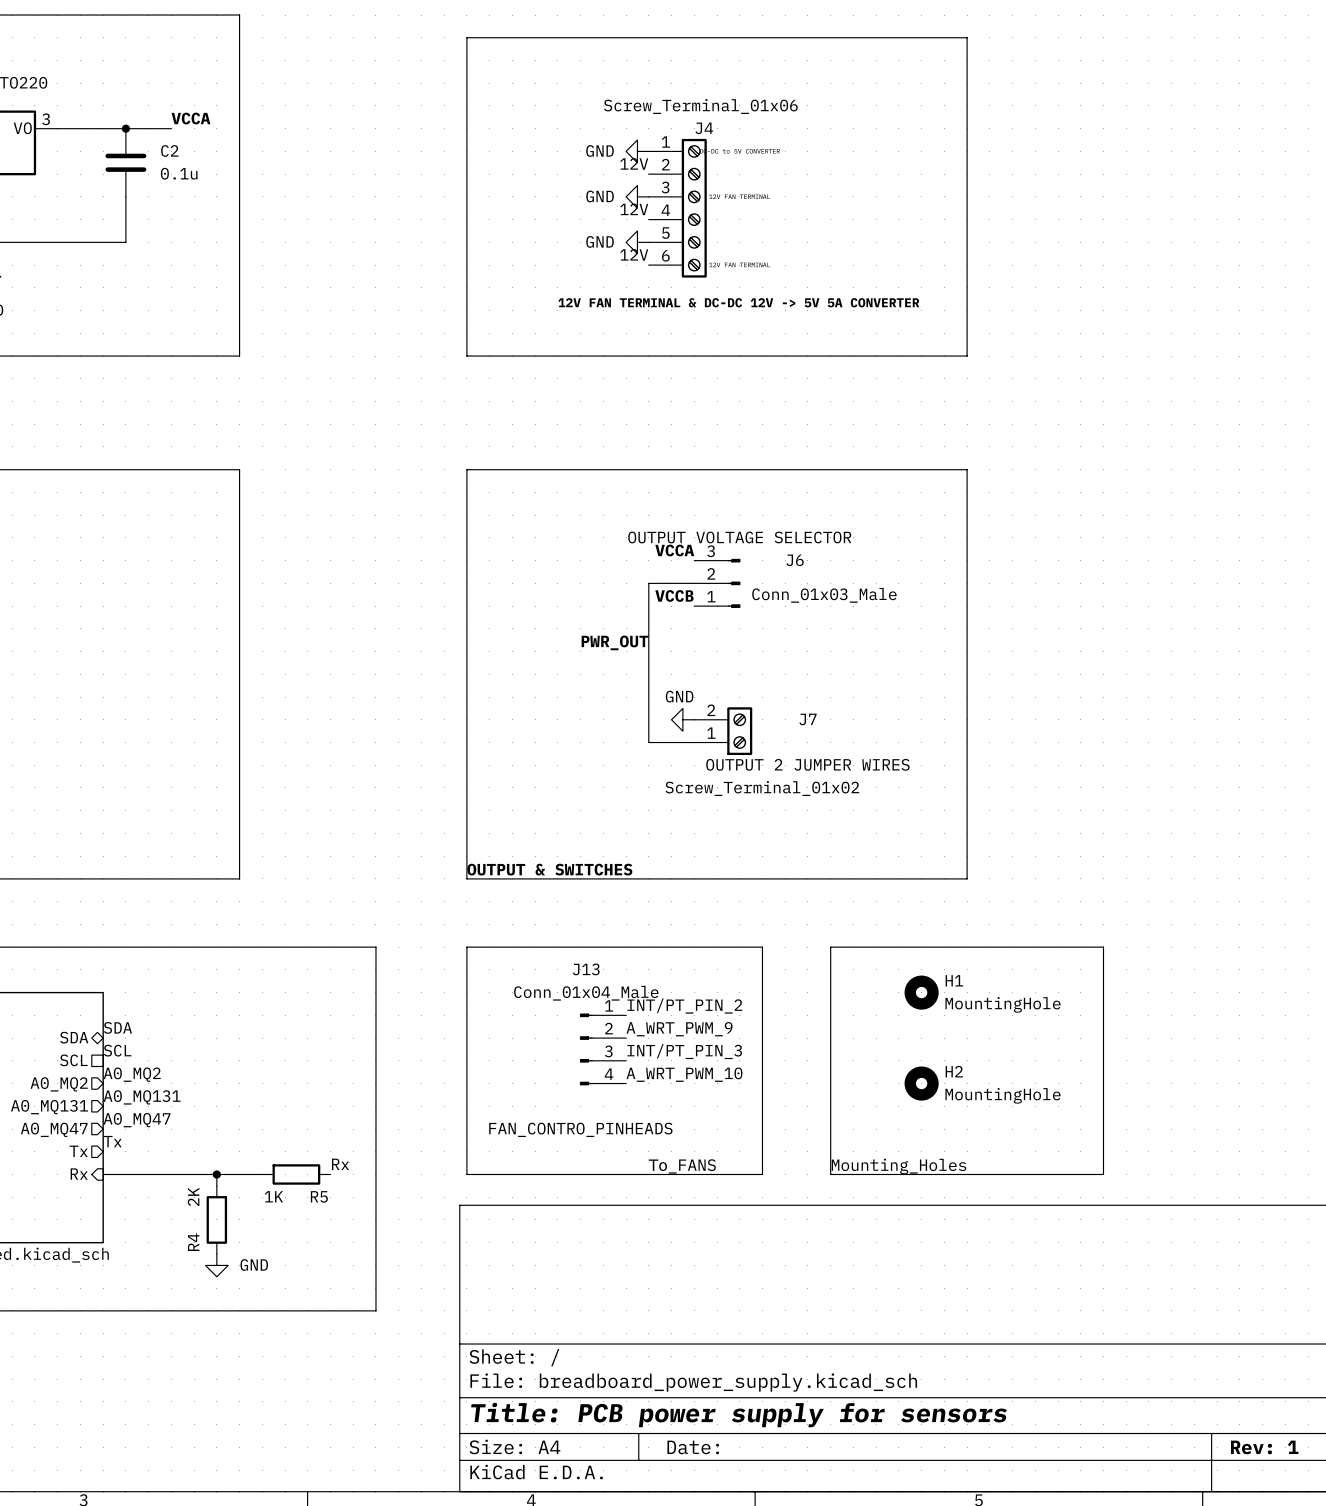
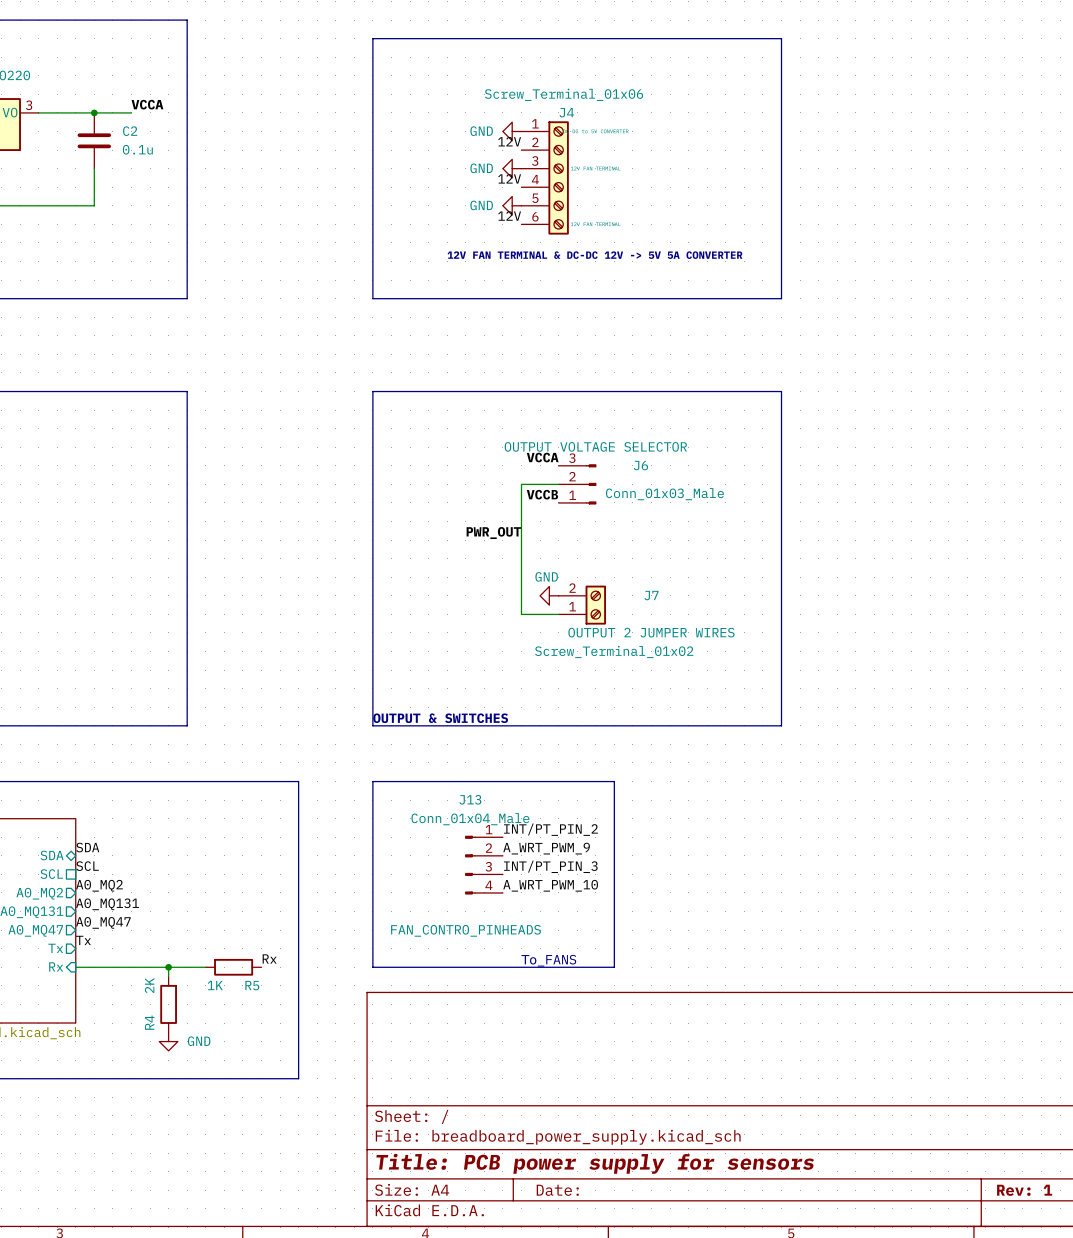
line: (830, 947) (830, 1174) (1103, 1174) (1103, 947) (830, 947) -> none
H1: MountingHole (921, 992) -> none
H2: MountingHole (921, 1083) -> none
text: Mounting_Holes (899, 1166) -> none

